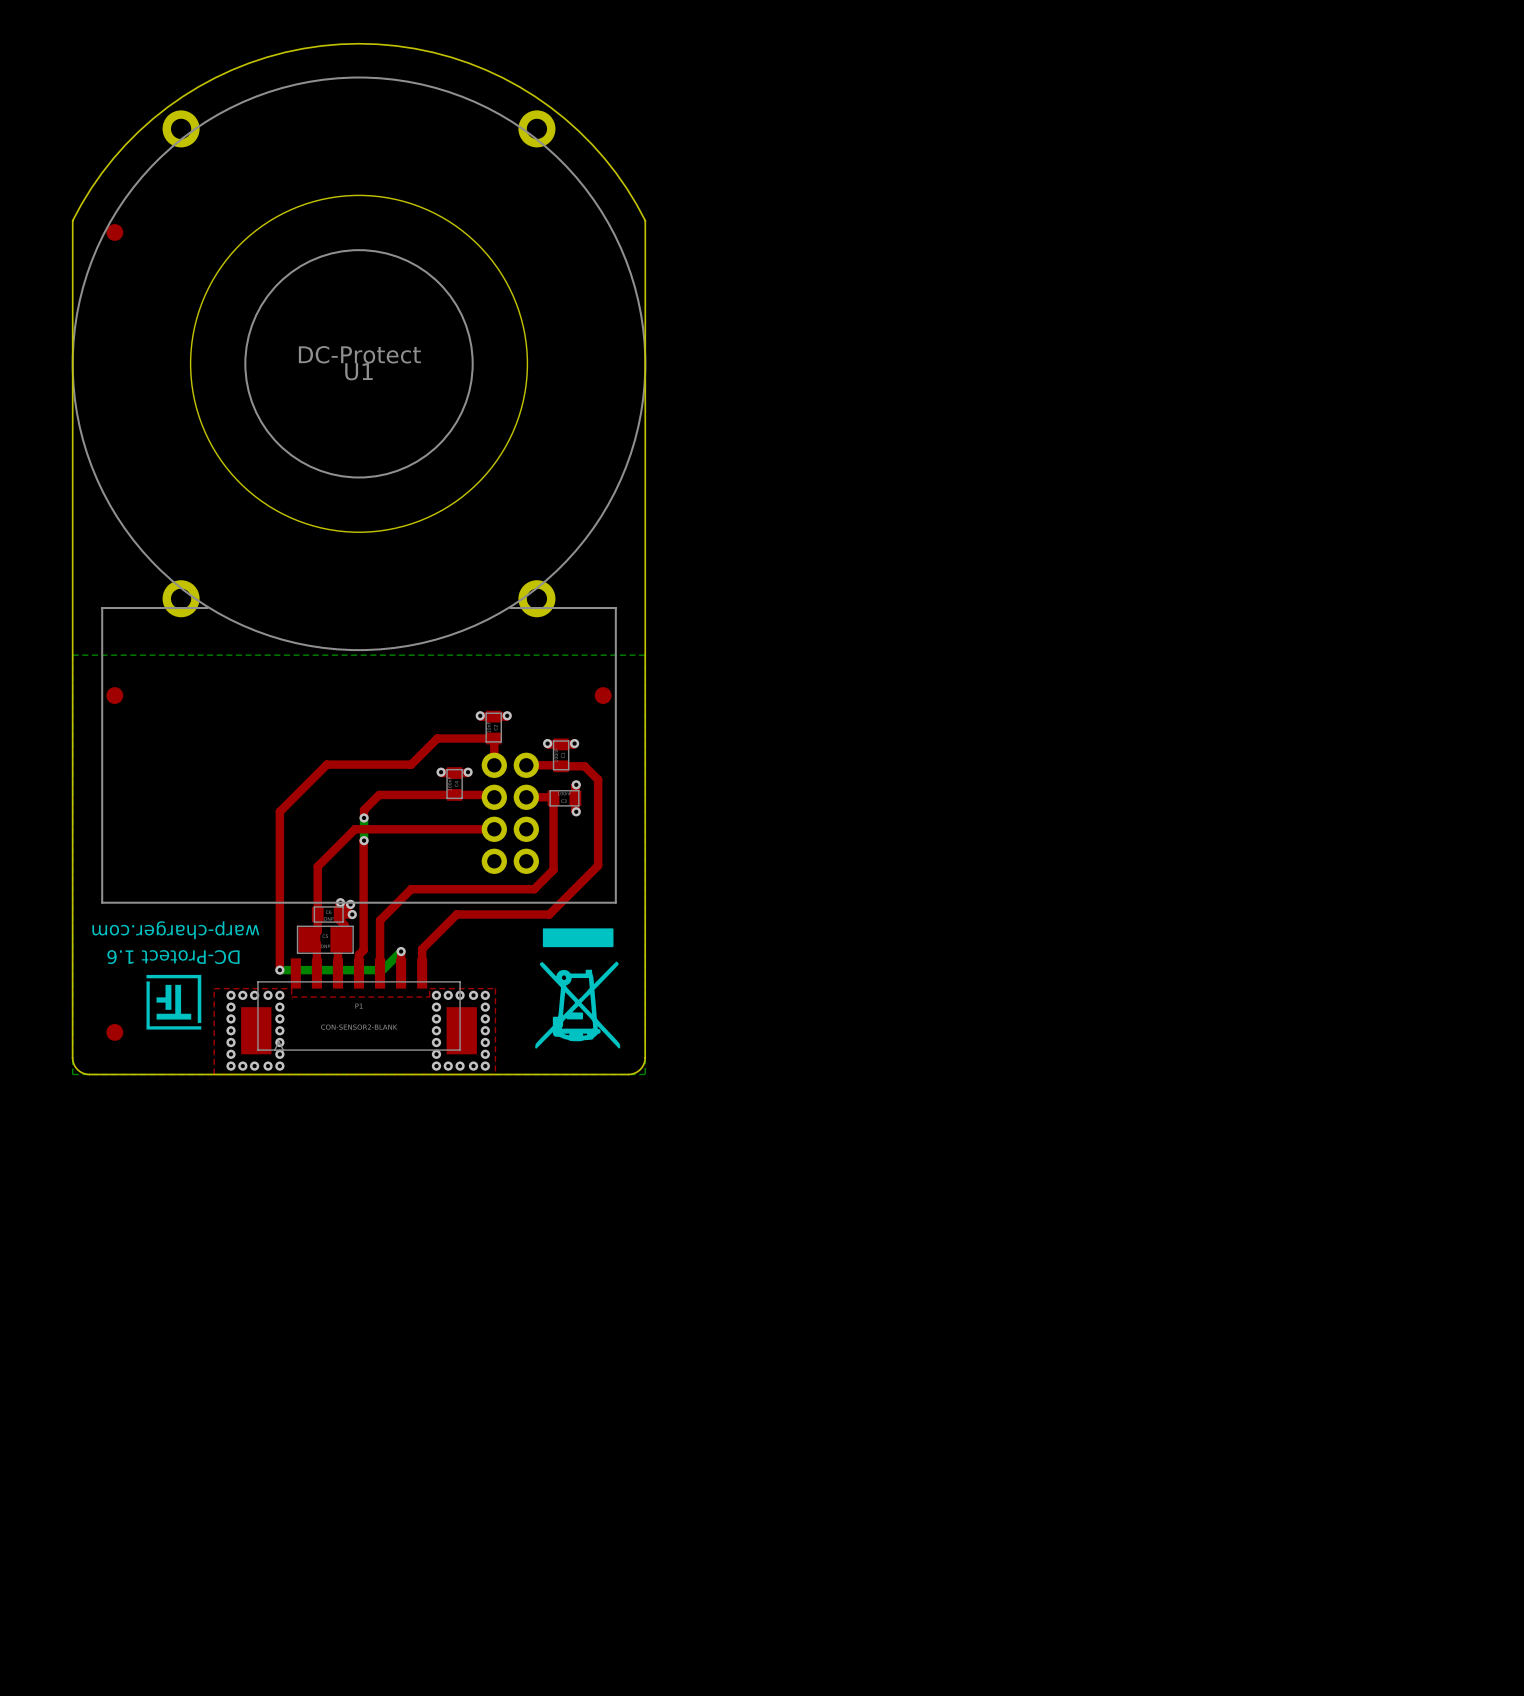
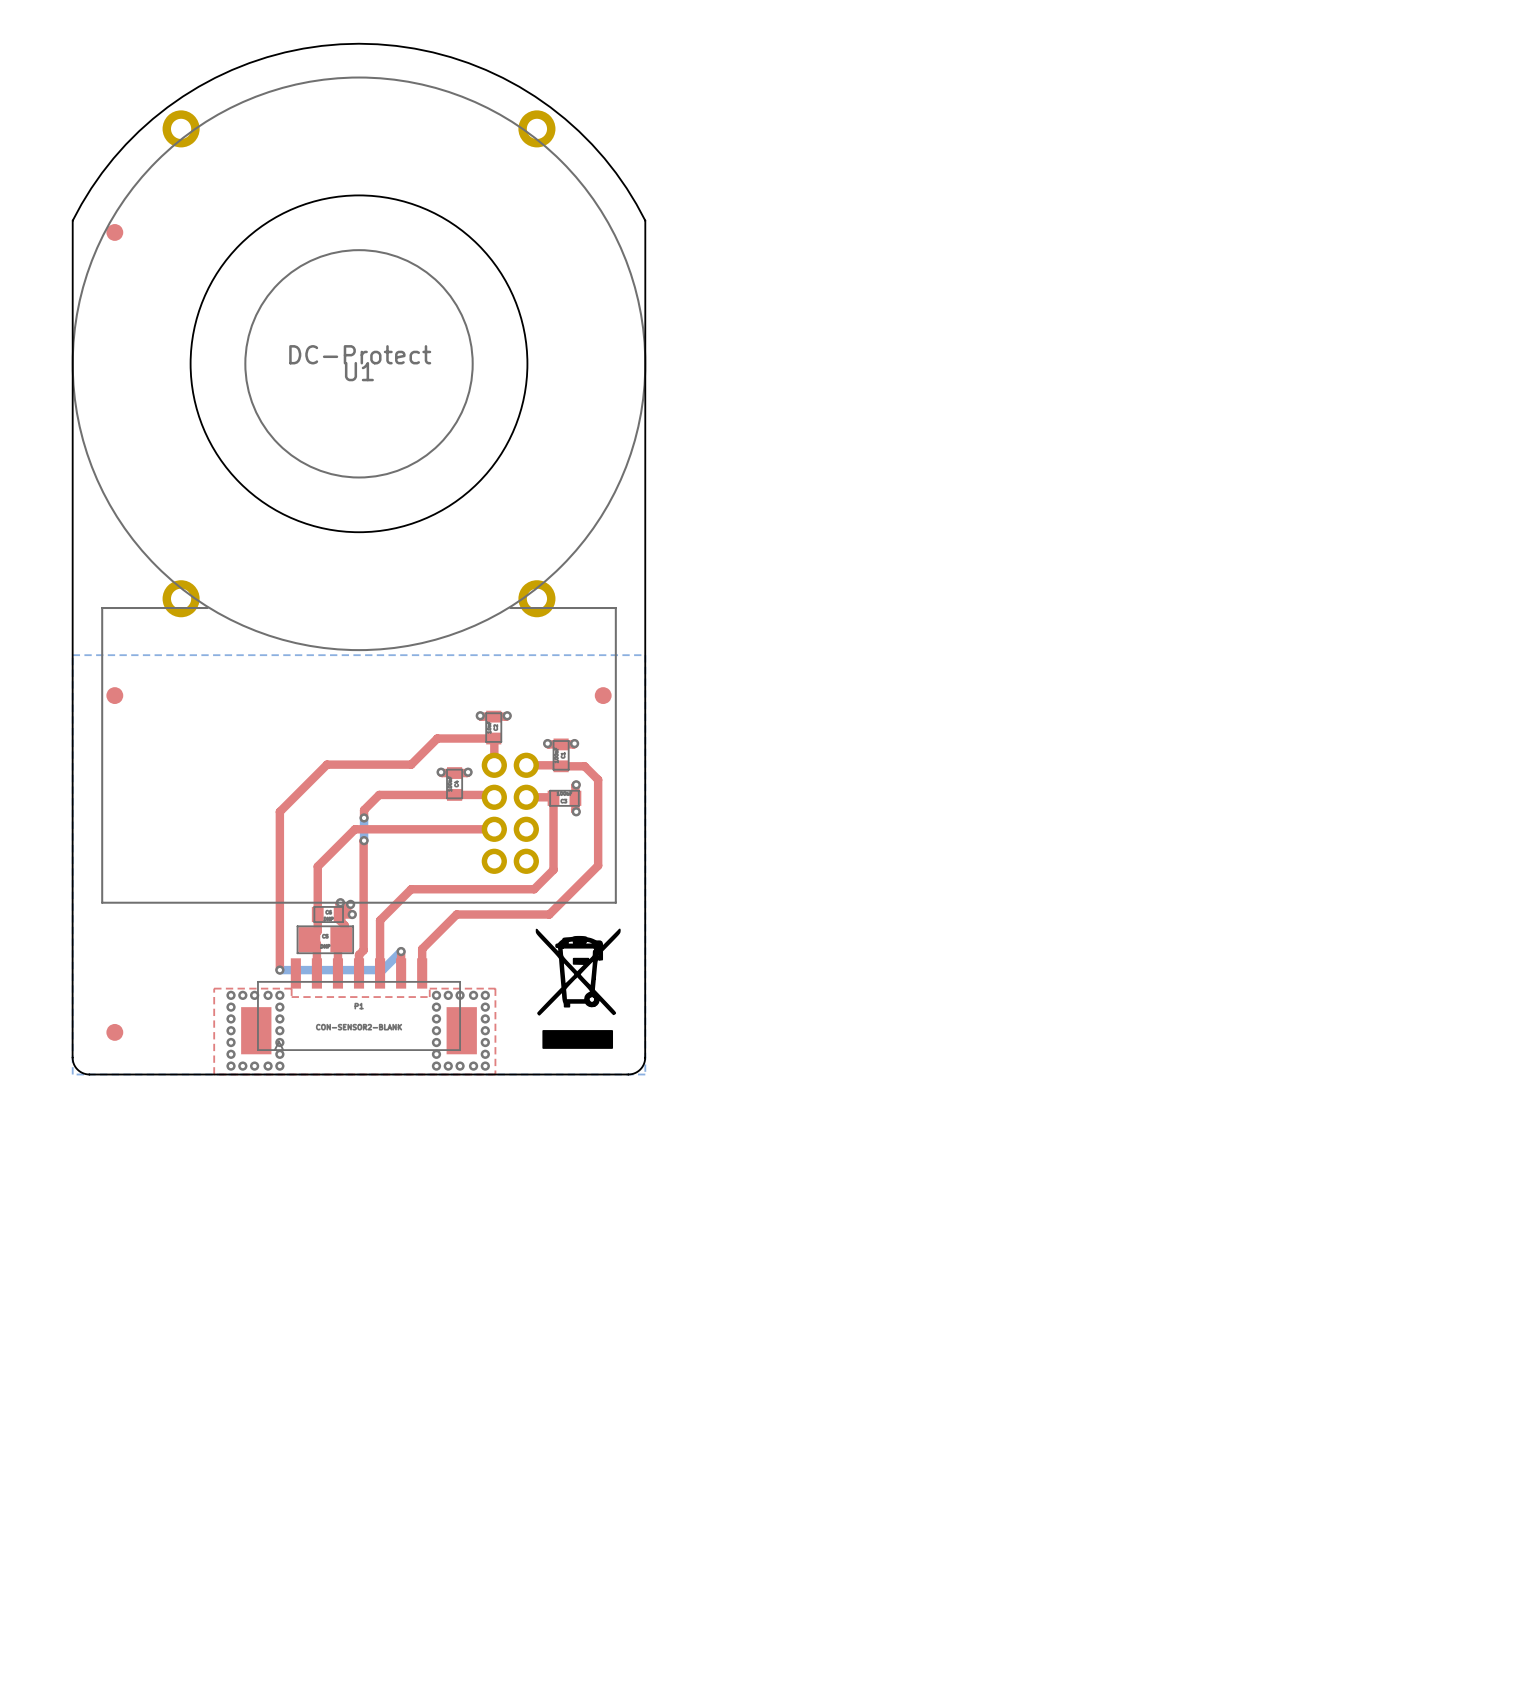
drawing shape: [535, 928, 621, 1049] -> [535, 928, 621, 1049]
text: warp-charger.com (175, 930) -> none
text: DC-Protect 1.6 (173, 957) -> none
drawing: [146, 974, 202, 1030] -> none

